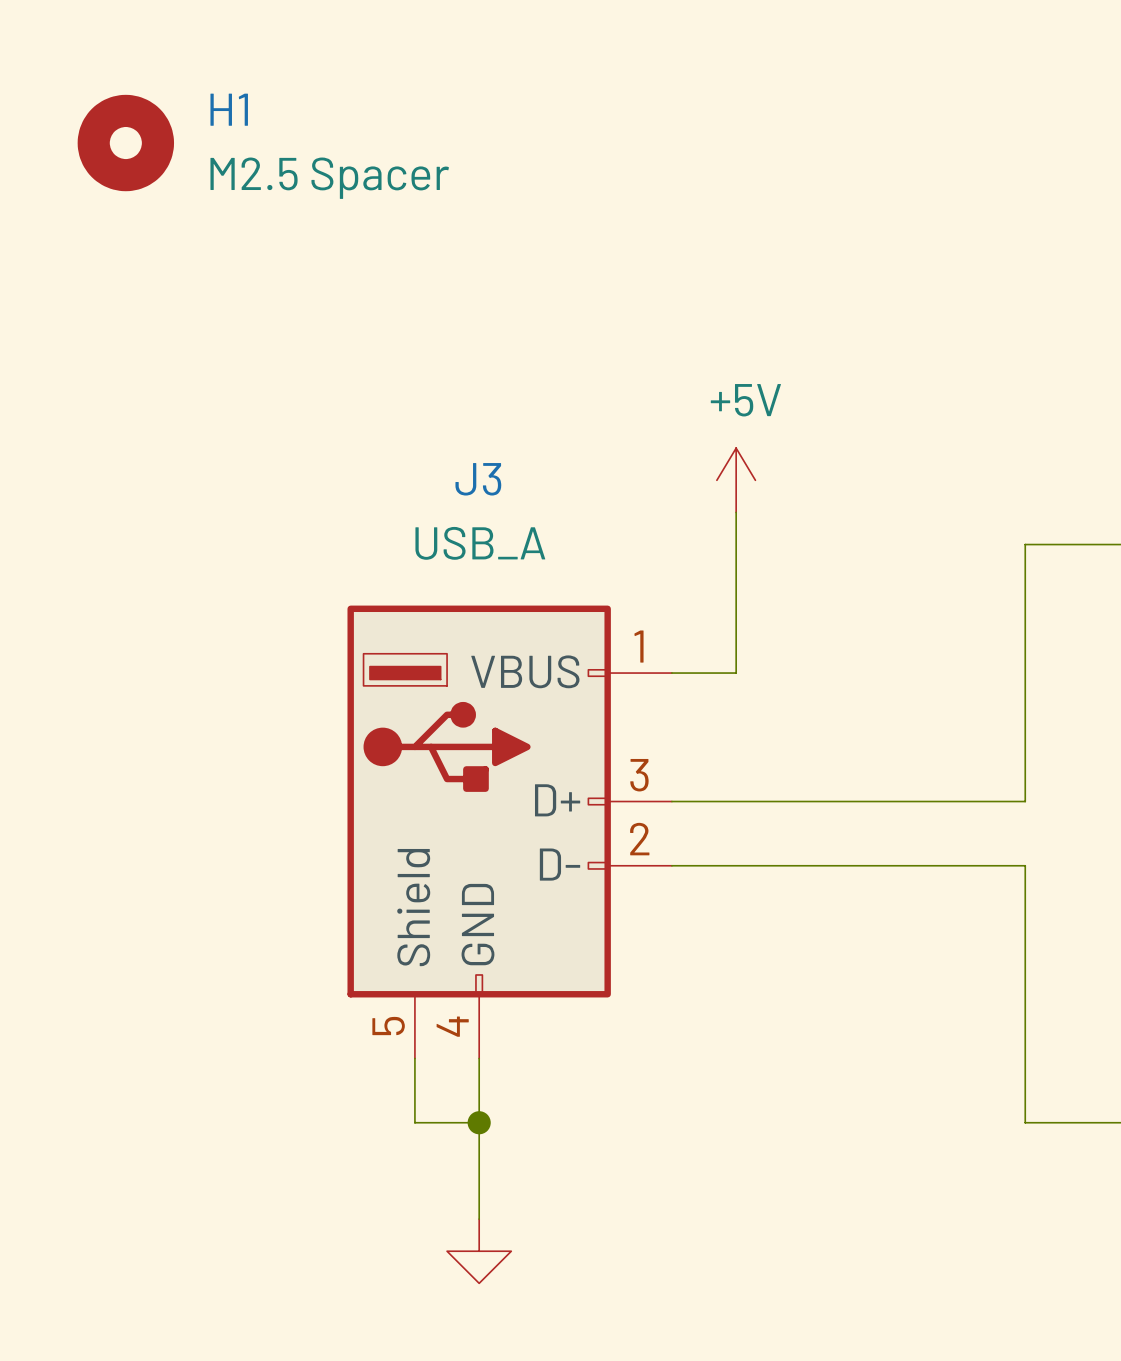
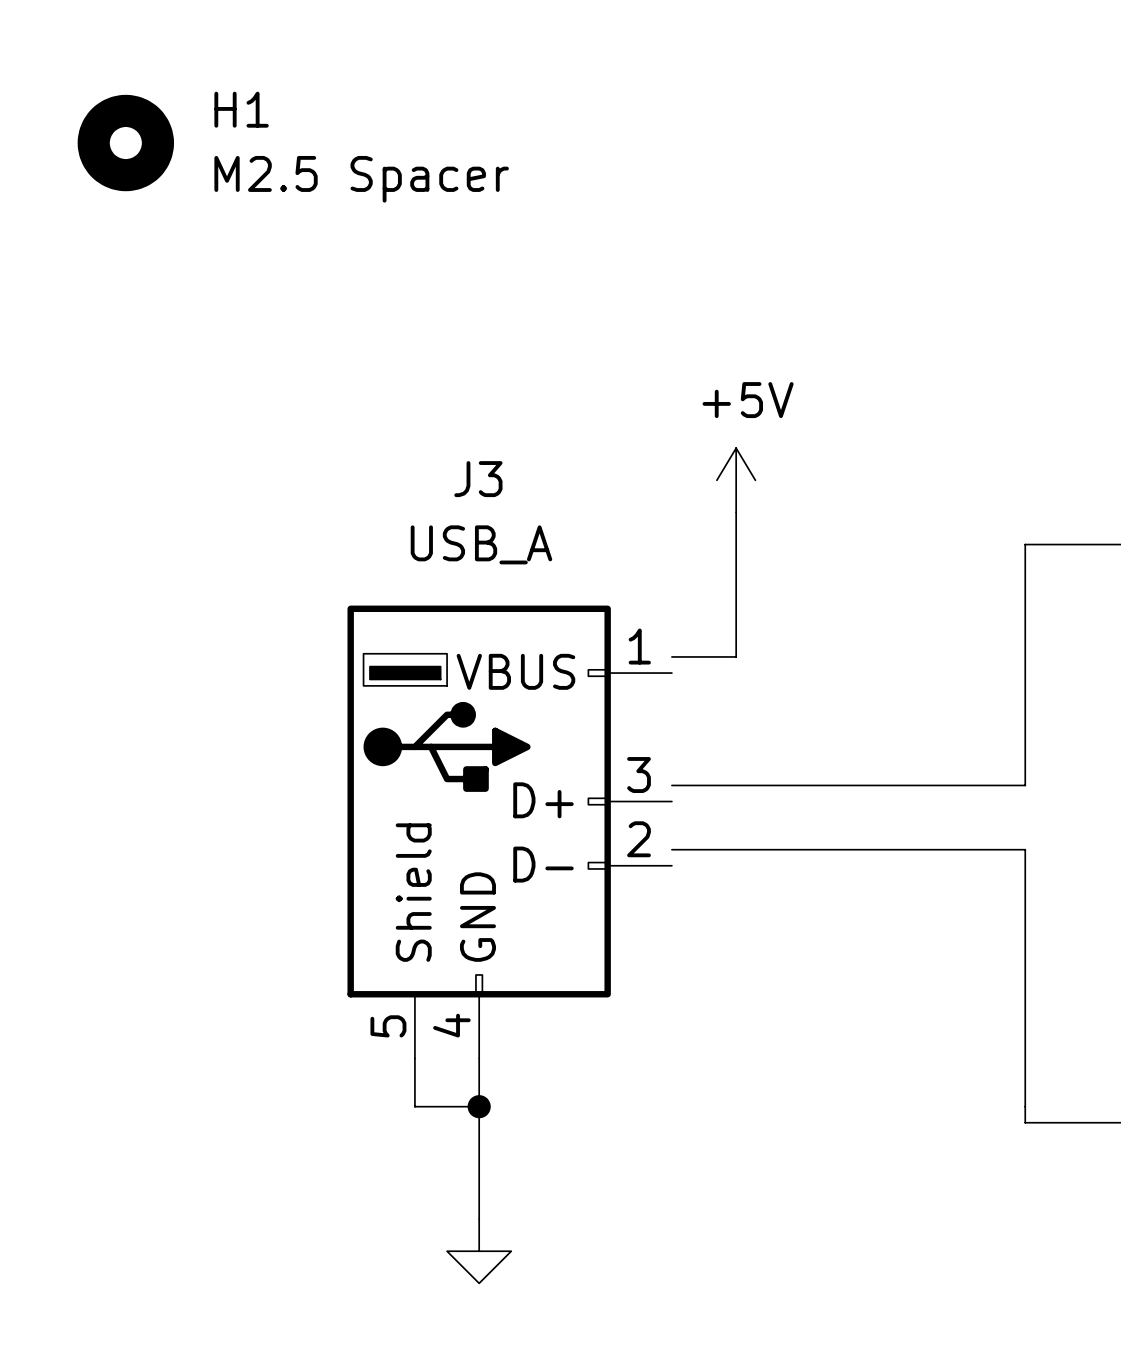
wire: (736, 656) (736, 673) (671, 673) -> (736, 656) (671, 656)
wire: (1025, 785) (1025, 801) (671, 801) -> (1025, 785) (671, 785)
wire: (671, 865) (1025, 865) -> (671, 849) (1025, 849) (1025, 865)
wire: (414, 1106) (414, 1122) (479, 1122) -> (414, 1106) (479, 1106)
junction position: (479, 1122) -> (479, 1106)

